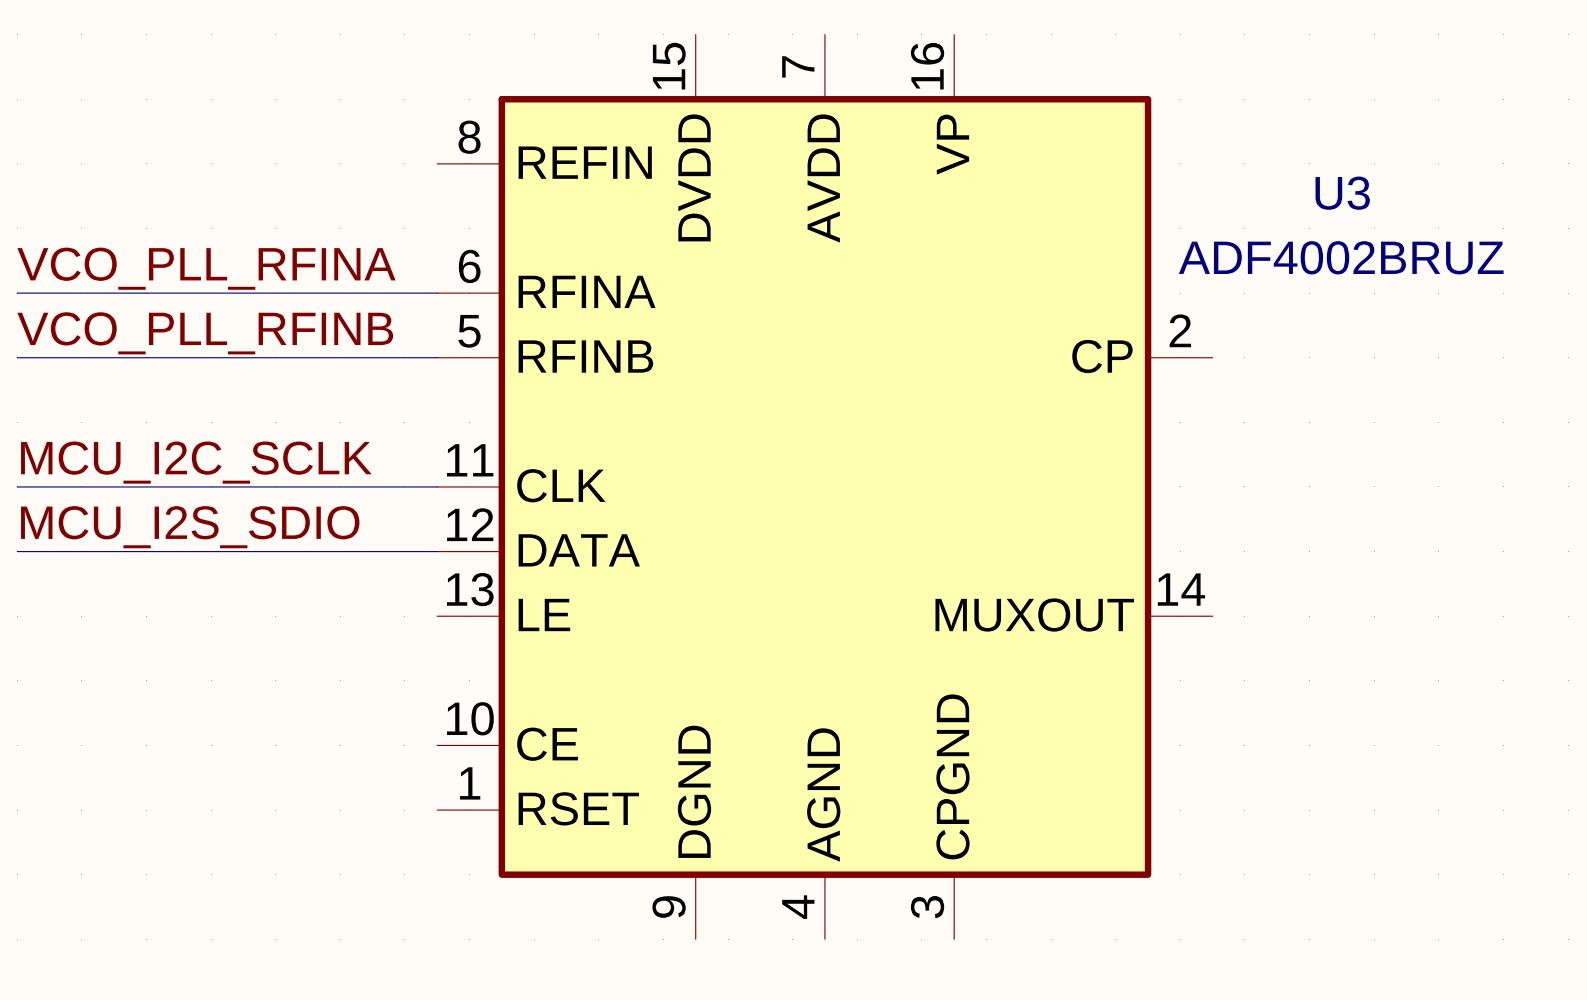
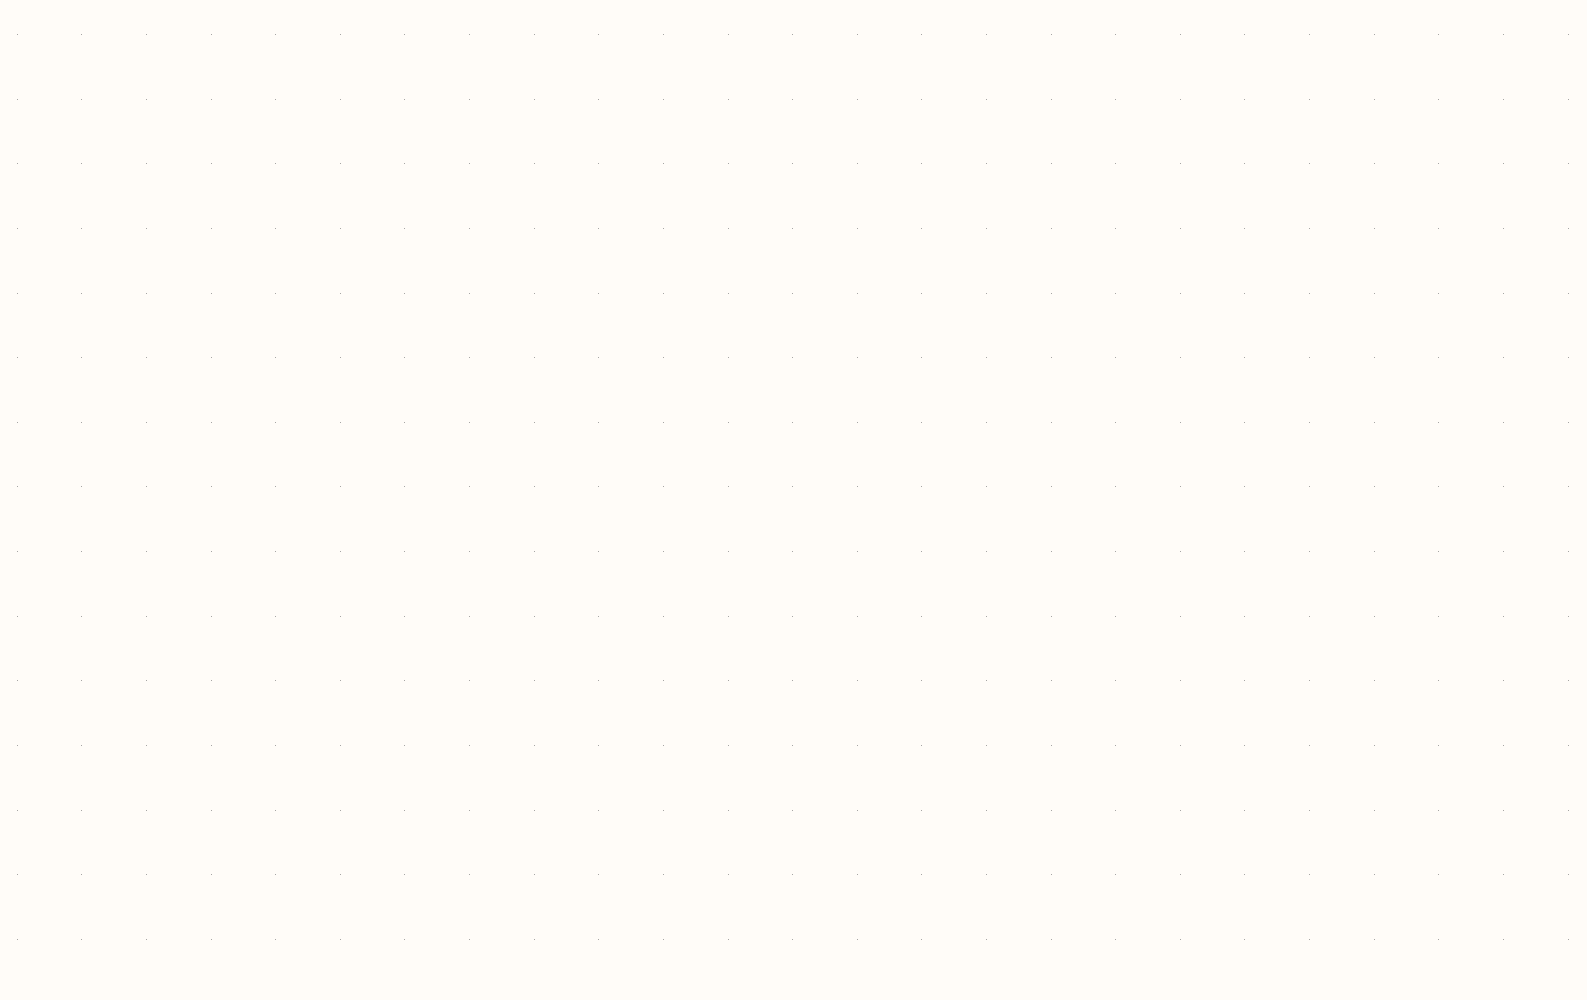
label: VCO_PLL_RFINA (206, 268) -> none
wire: (17, 293) (437, 293) -> none
label: VCO_PLL_RFINB (205, 333) -> none
wire: (17, 357) (437, 357) -> none
label: MCU_I2C_SCLK (196, 462) -> none
wire: (17, 486) (437, 486) -> none
U3: ADF4002BRUZ (824, 486) -> none
label: MCU_I2S_SDIO (190, 527) -> none
wire: (17, 551) (437, 551) -> none

